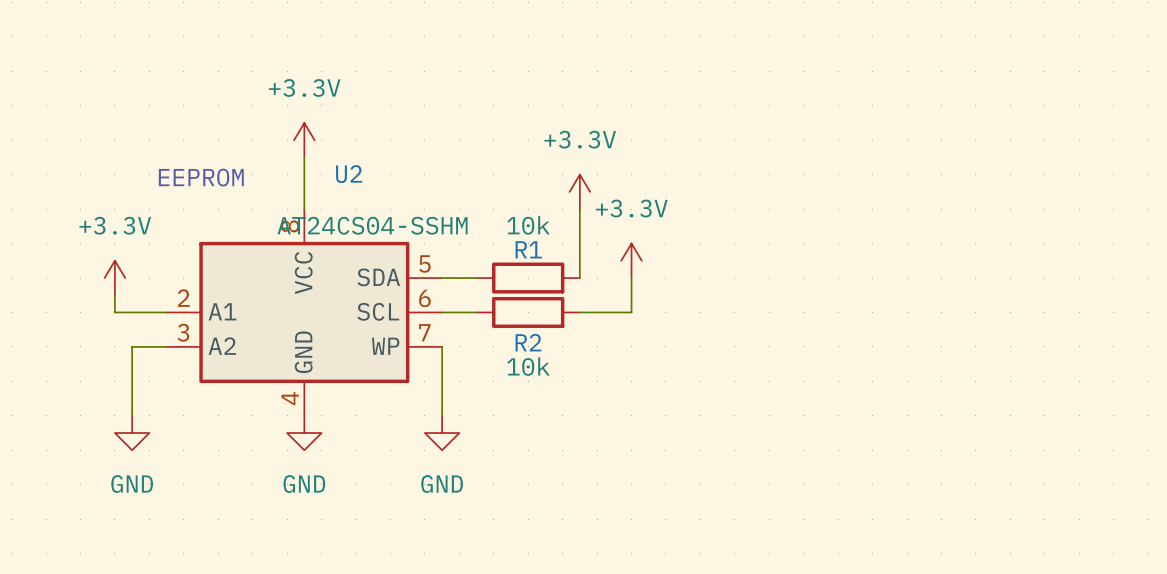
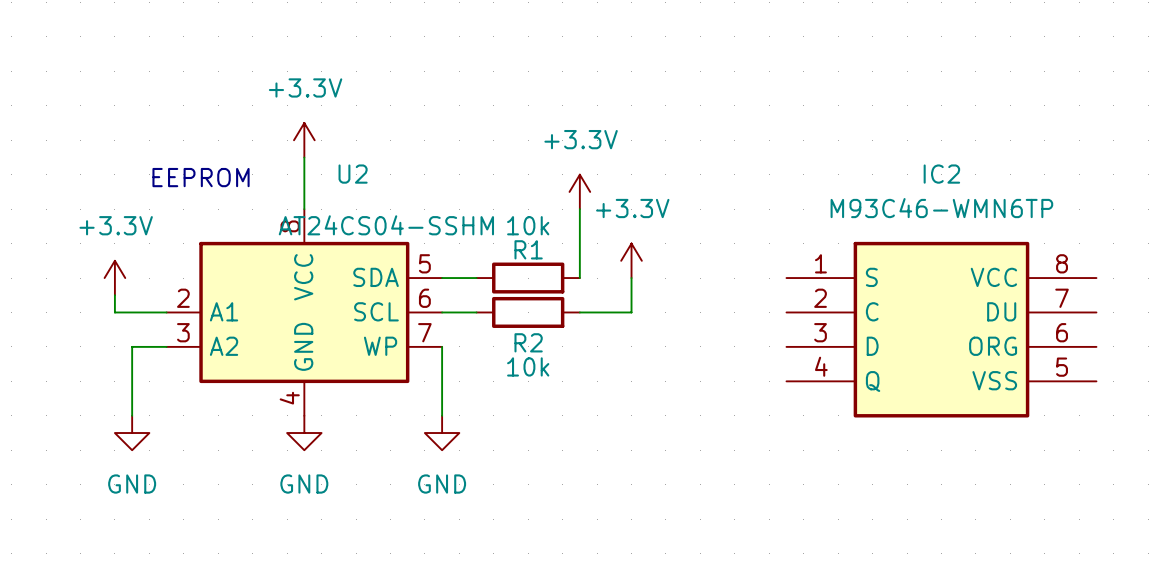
IC2: none -> M93C46-WMN6TP (941, 329)

